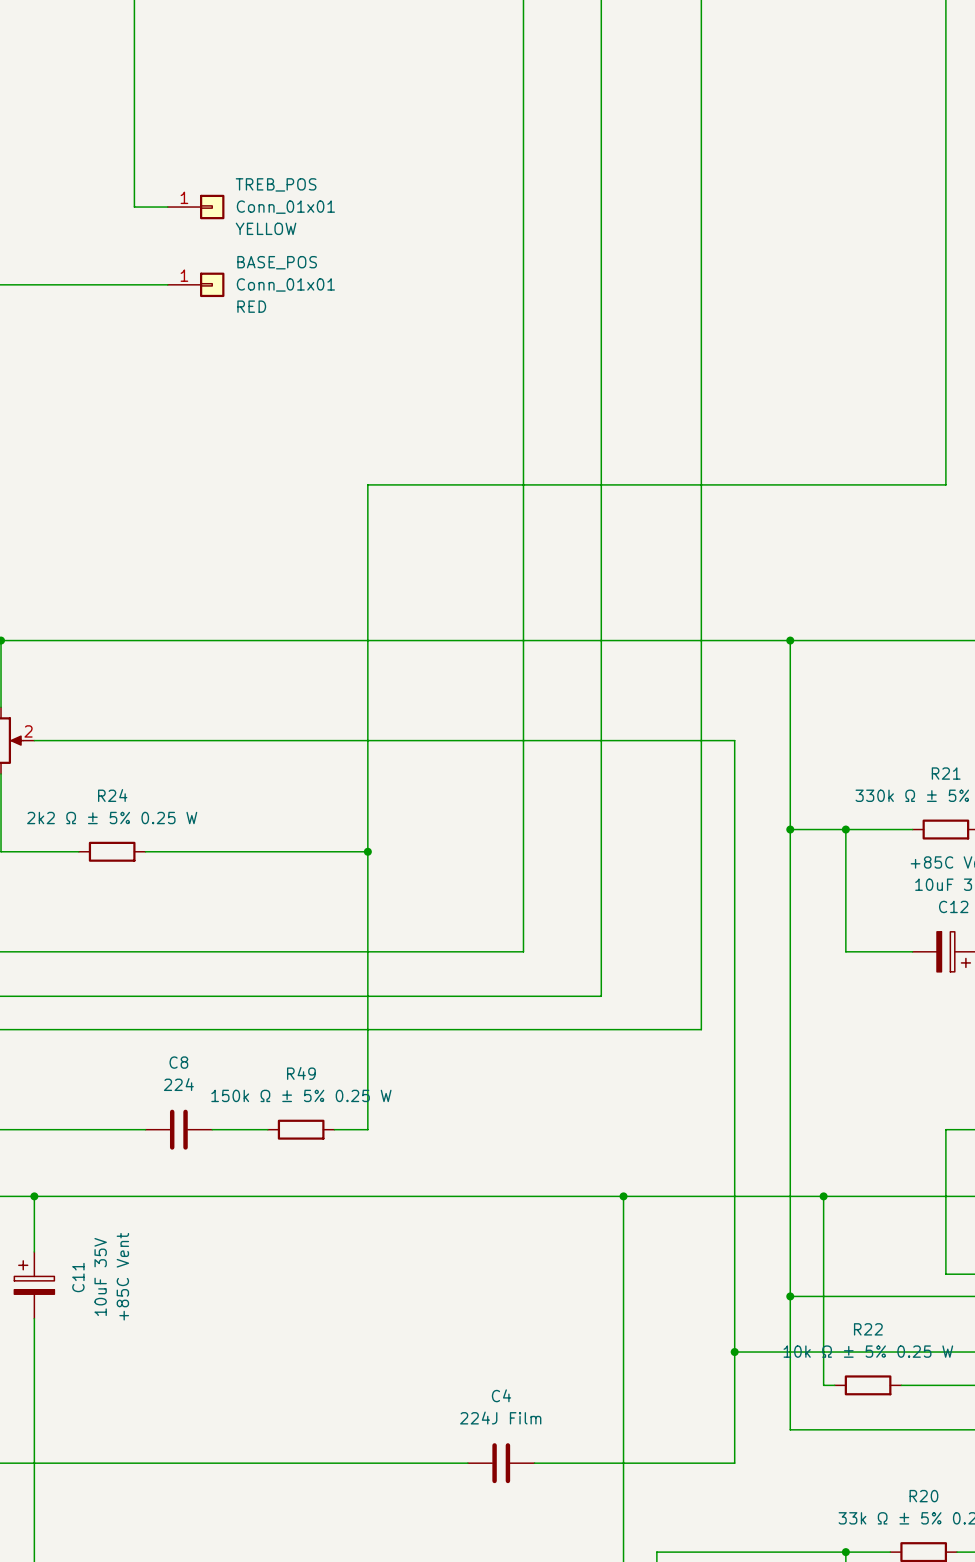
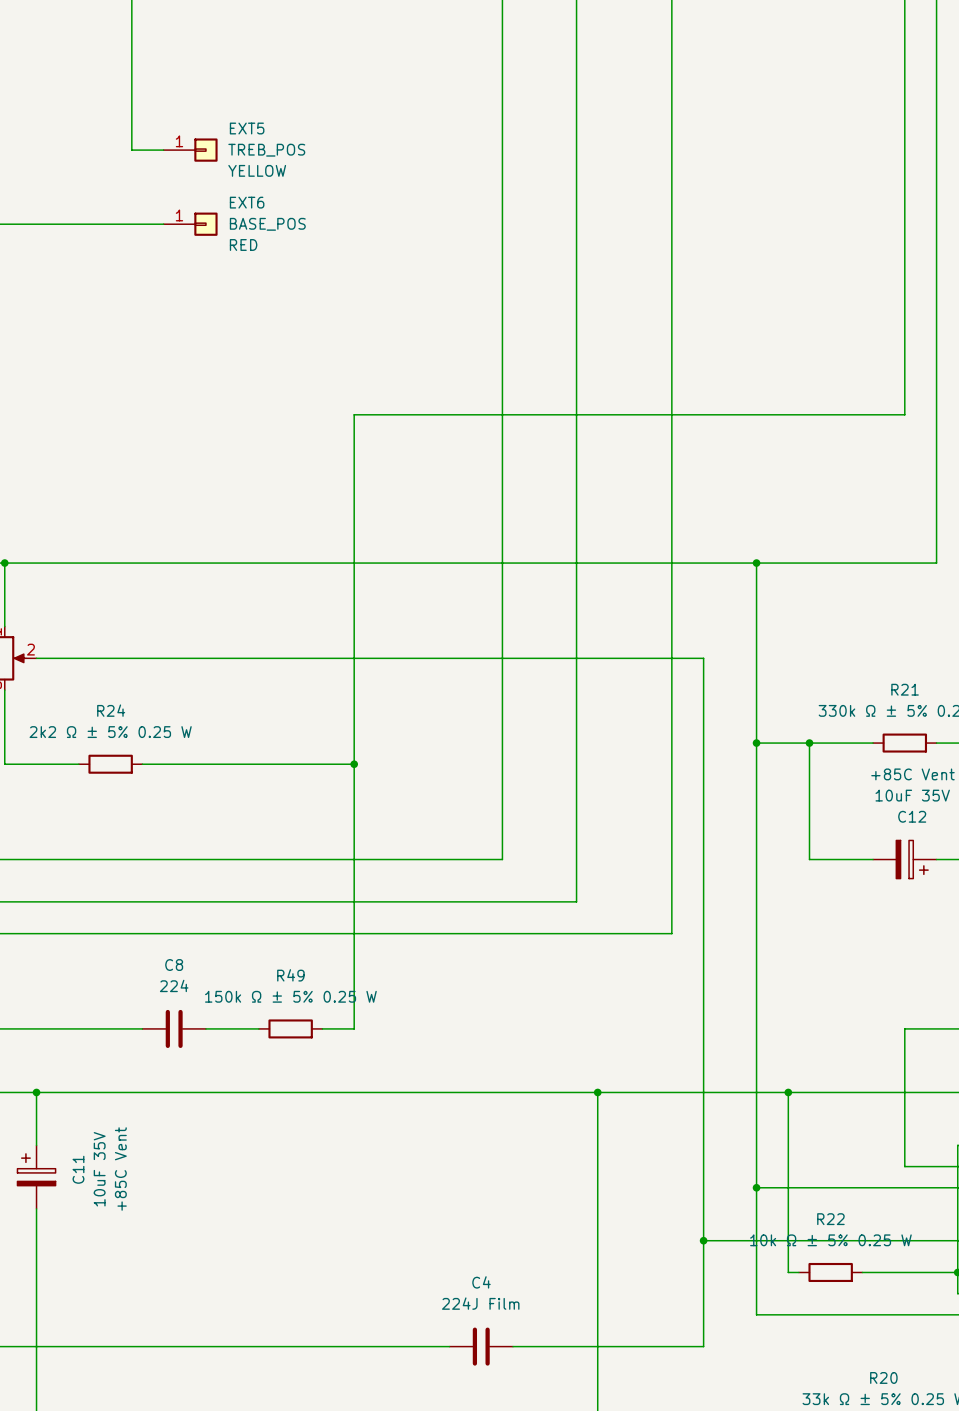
TREB_POS name: TREB_POS (276, 184) -> EXT5 (247, 128)
TREB_POS value: Conn_01x01 (285, 207) -> TREB_POS (266, 150)
BASE_POS name: BASE_POS (277, 262) -> EXT6 (247, 202)
BASE_POS value: Conn_01x01 (285, 284) -> BASE_POS (267, 224)

